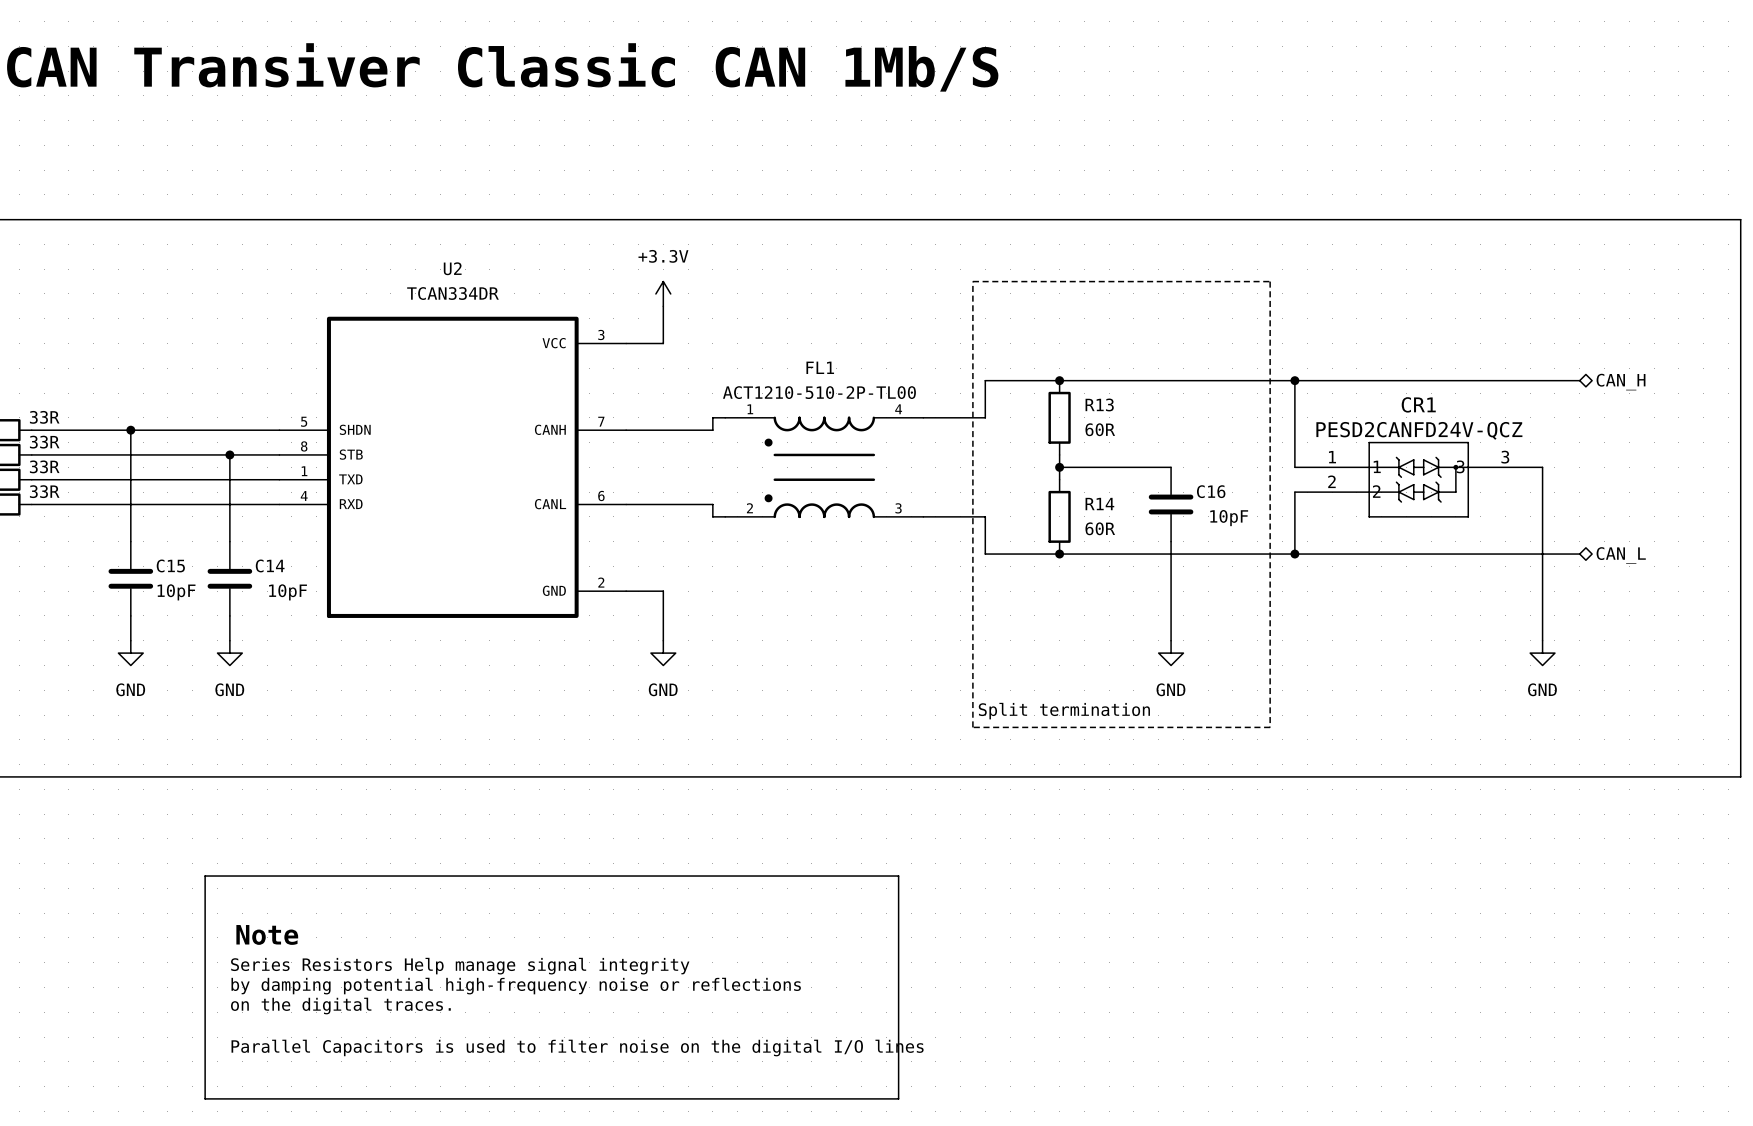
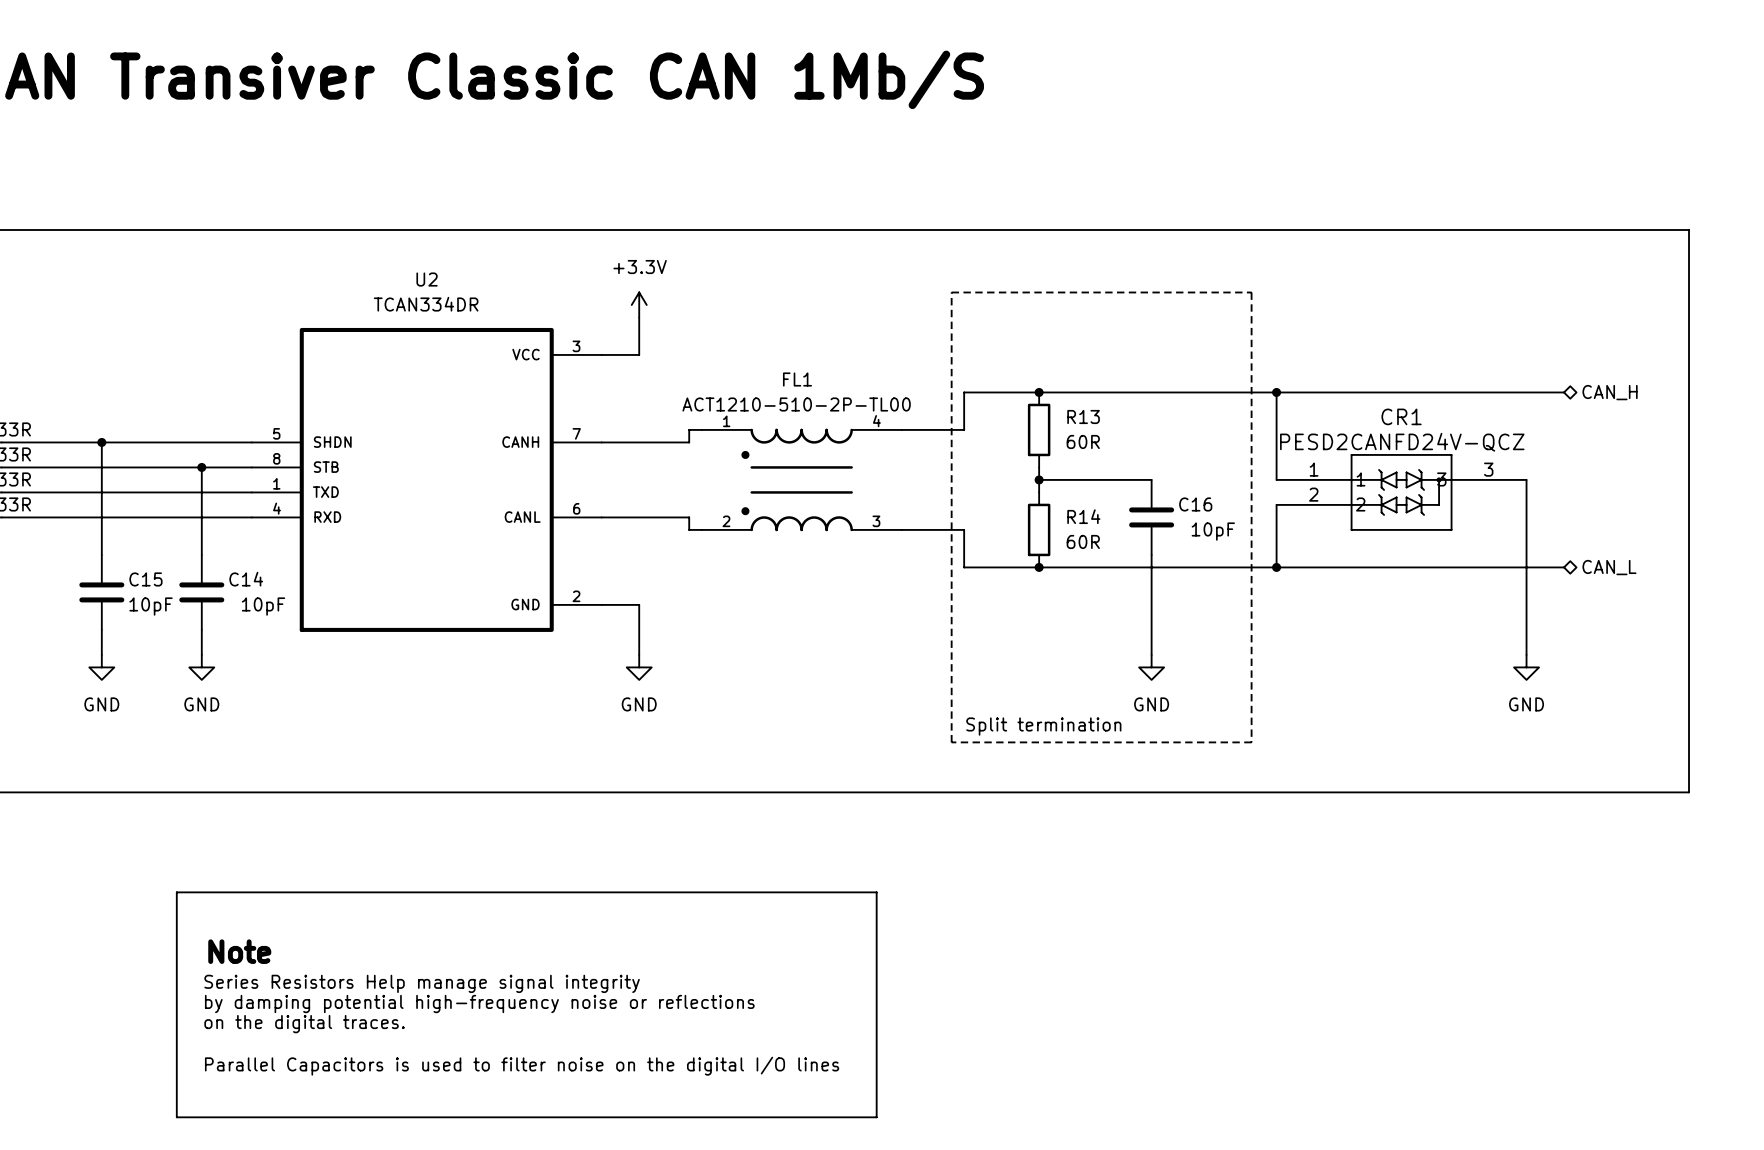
line: (1703, 219) (1740, 219) (1740, 776) (1703, 776) -> (1689, 230) (1689, 792)

